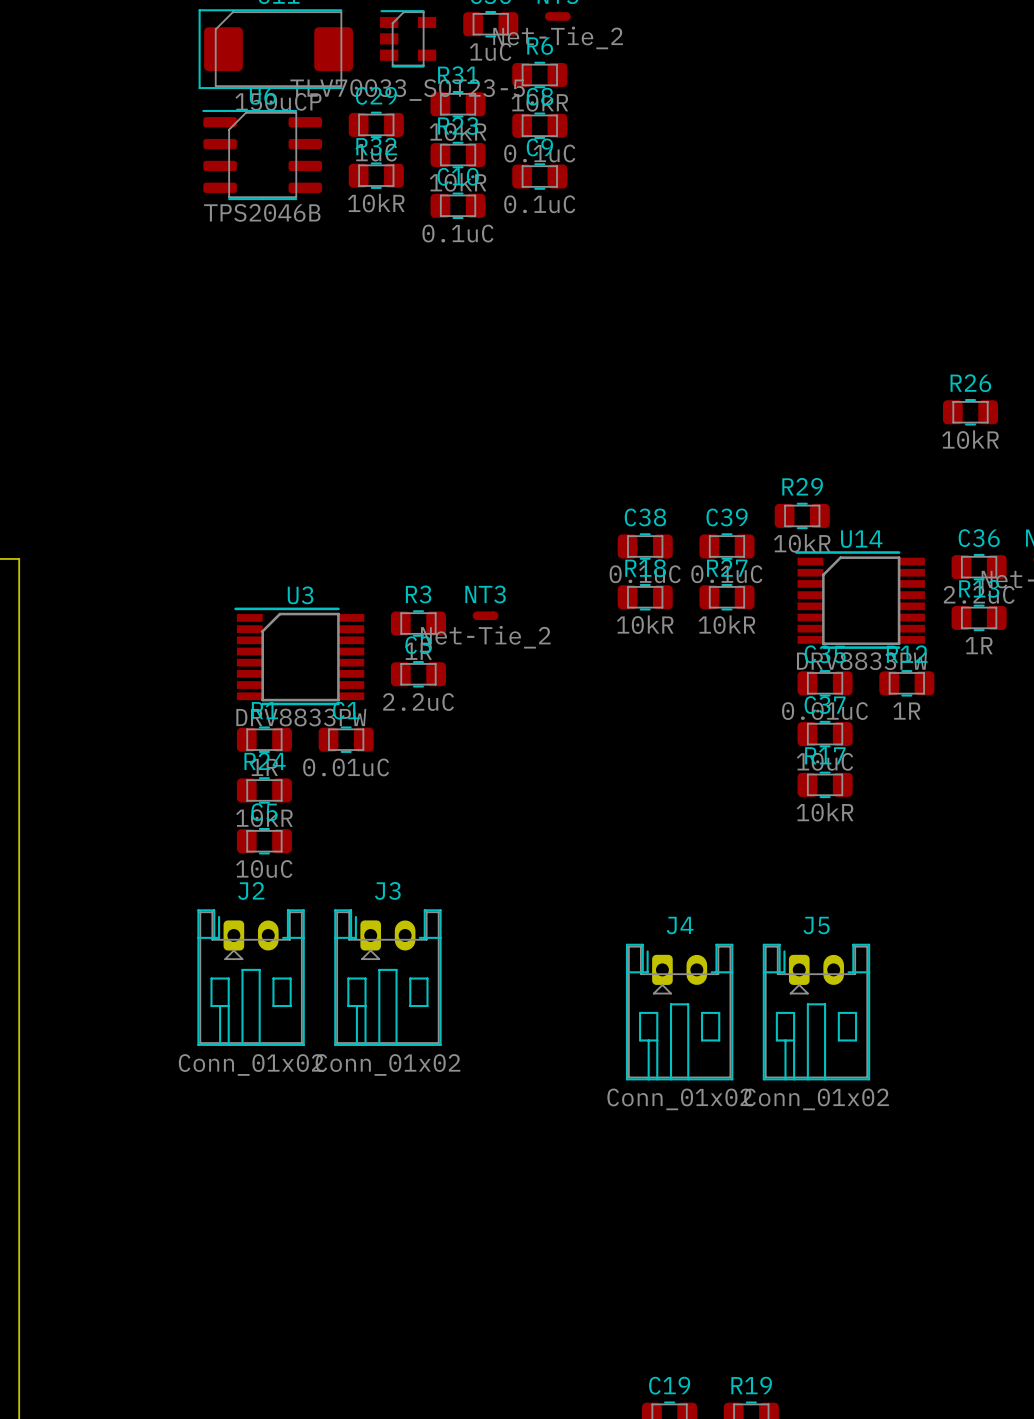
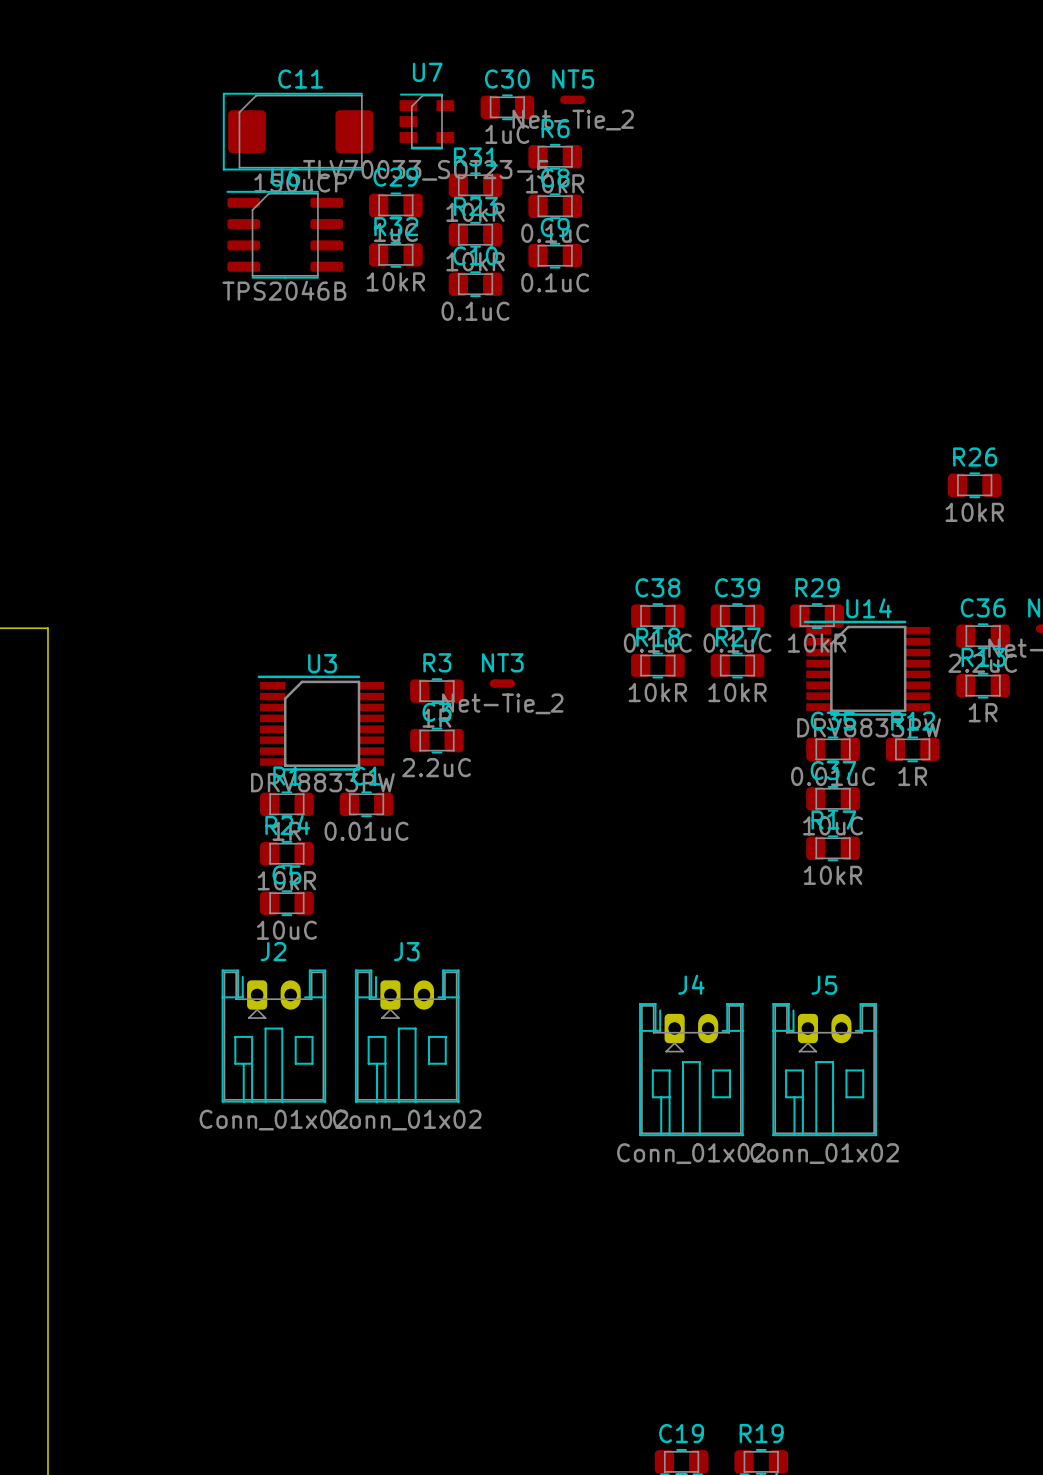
R29 position: (802, 515) -> (817, 616)

